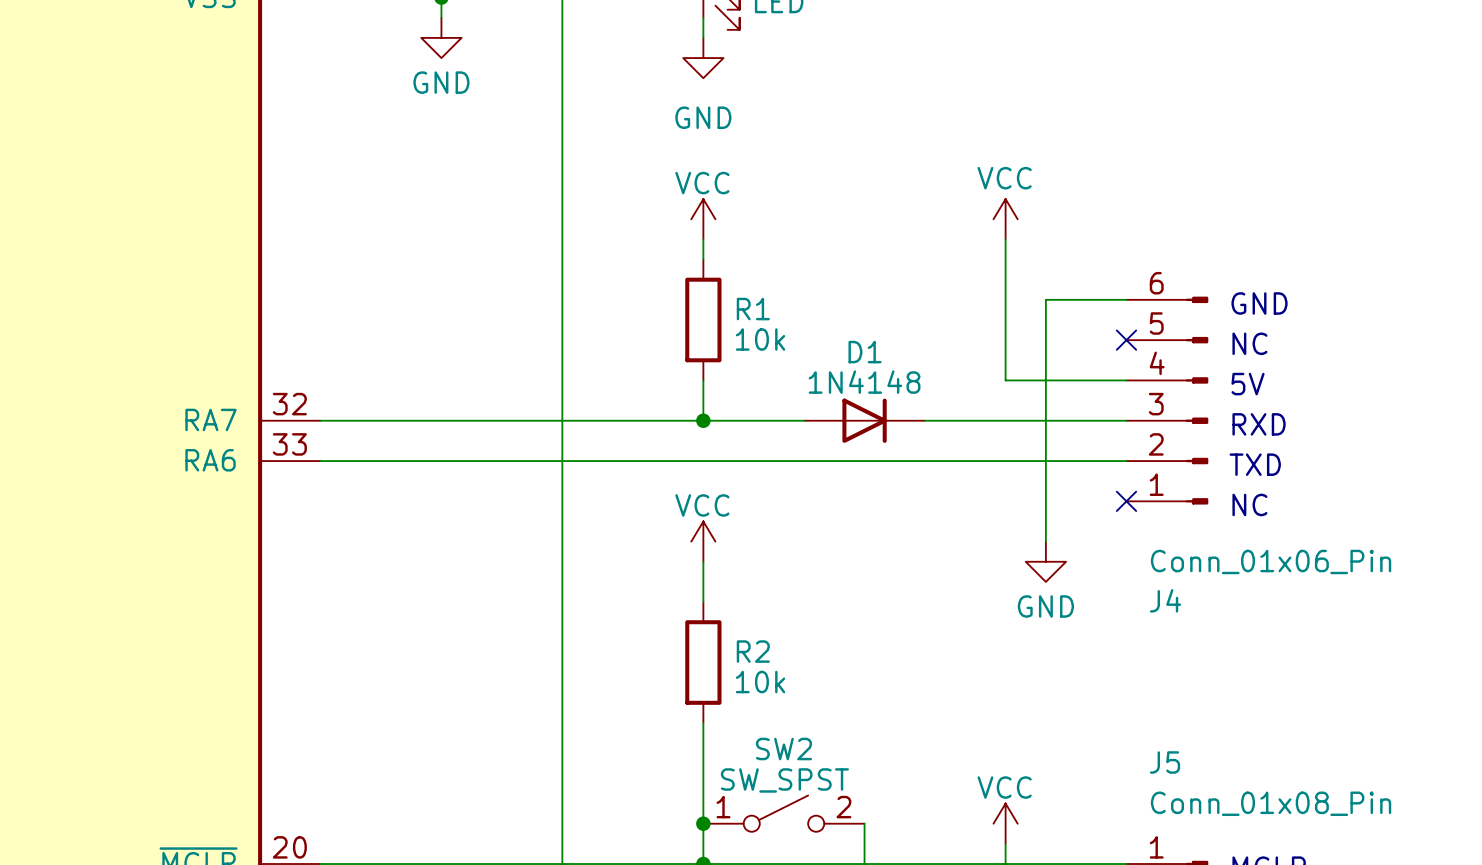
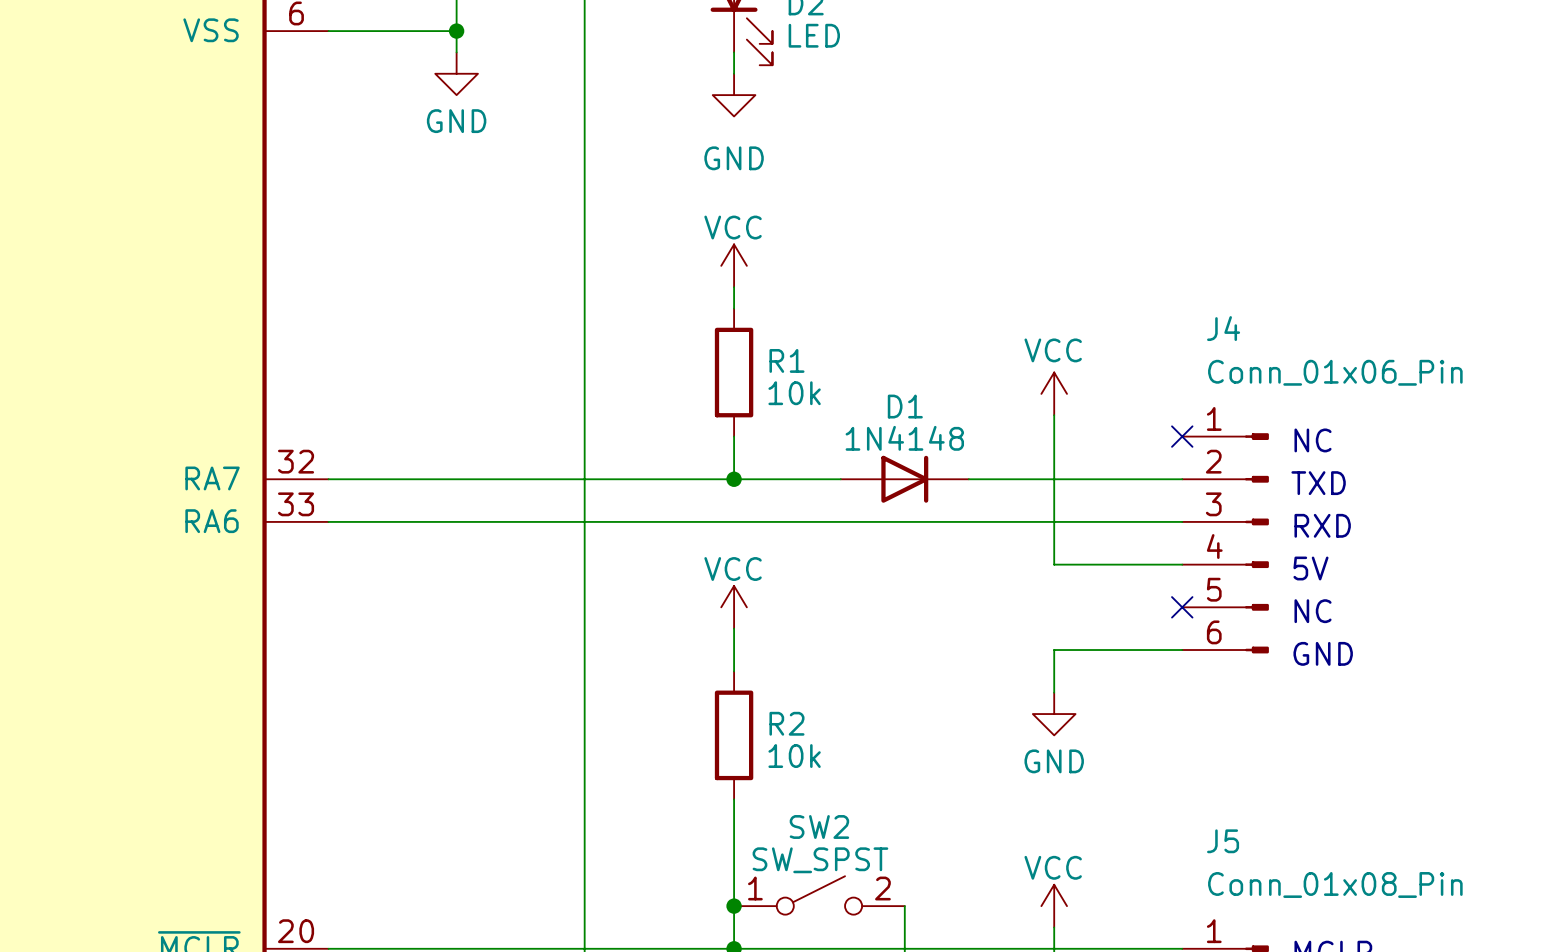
power symbol position: VCC (1005, 219) -> VCC (1054, 393)
wire: (1005, 239) (1005, 360) -> none
wire: (1126, 299) (1045, 299) (1045, 541) -> none
text position: GND (1259, 303) -> GND (1323, 653)
no-connect mark position: (1126, 340) -> (1182, 436)
text position: NC (1249, 343) -> NC (1313, 611)
wire: (1005, 380) (1126, 380) -> (1054, 436) (1054, 564) (1182, 564)
text: 5V (1248, 384) -> NC (1313, 440)
J4 flip: as is (1197, 400) -> up-down (1256, 543)
text: RXD (1259, 424) -> TXD (1318, 483)
text: TXD (1255, 464) -> RXD (1322, 525)
no-connect mark position: (1126, 501) -> (1182, 607)
text: NC (1249, 504) -> 5V (1310, 568)
power symbol position: GND (1045, 561) -> GND (1054, 714)
wire: none -> (1182, 650) (1054, 650) (1054, 692)

